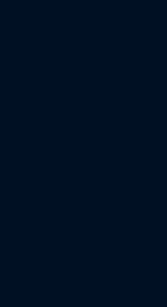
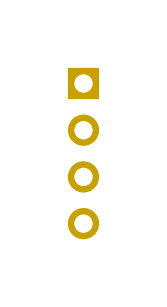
part: none -> (83, 153)

